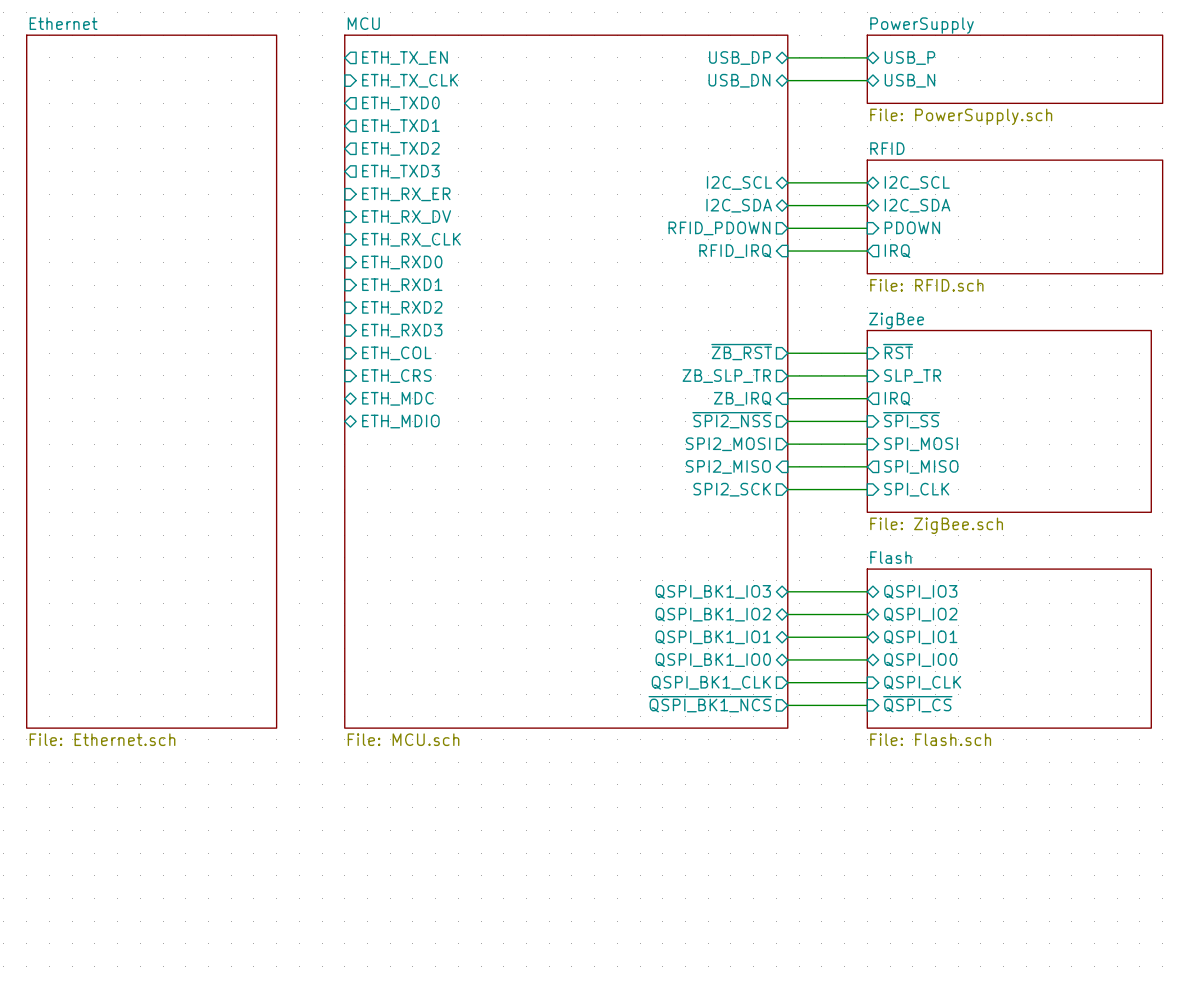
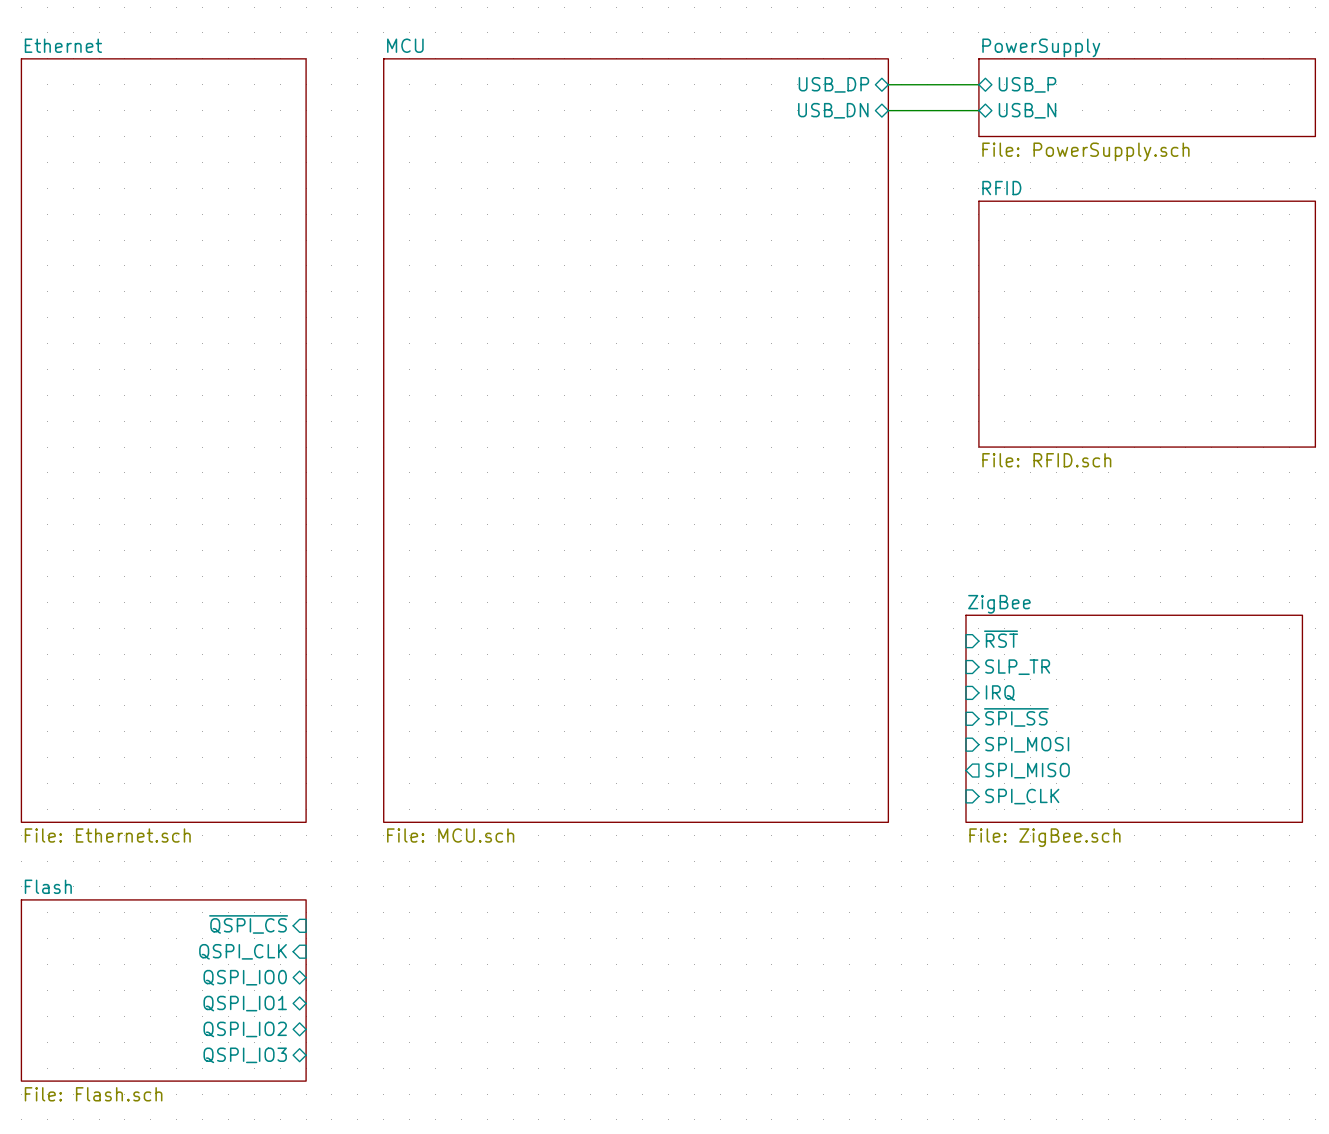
sheet pin: ETH_TX_EN (404, 58) -> none
sheet pin: ETH_TX_CLK (410, 80) -> none
sheet pin: ETH_TXD0 (400, 103) -> none
sheet pin: ETH_TXD1 (400, 126) -> none
sheet pin: ETH_TXD2 (400, 148) -> none
sheet pin: ETH_TXD3 (400, 171) -> none
sheet pin: I2C_SCL (739, 182) -> none
wire: (787, 182) (867, 182) -> none
sheet pin: I2C_SCL (917, 182) -> none
sheet pin: ETH_RX_ER (406, 194) -> none
sheet pin: I2C_SDA (739, 205) -> none
wire: (787, 205) (867, 205) -> none
sheet pin: I2C_SDA (917, 205) -> none
sheet RFID: File: RFID.sch (1014, 216) -> none
sheet pin: ETH_RX_DV (406, 217) -> none
sheet pin: PDOWN (912, 227) -> none
sheet pin: RFID_PDOWN (719, 228) -> none
wire: (787, 228) (867, 228) -> none
sheet pin: ETH_RX_CLK (411, 239) -> none
sheet pin: RFID_IRQ (735, 251) -> none
wire: (787, 251) (867, 251) -> none
sheet pin: IRQ (897, 251) -> none
sheet pin: ETH_RXD0 (402, 262) -> none
sheet RFID: none -> File: RFID.sch (1147, 324)
sheet pin: ETH_RXD1 (402, 285) -> none
sheet pin: ETH_RXD2 (402, 307) -> none
sheet pin: ETH_RXD3 (402, 330) -> none
sheet pin position: ~{RST} (898, 351) -> ~{RST} (1001, 639)
sheet pin: ~{ZB_RST} (741, 352) -> none
sheet pin: ETH_COL (396, 353) -> none
wire: (787, 353) (867, 353) -> none
sheet Ethernet: none -> File: Ethernet.sch (163, 440)
sheet MCU: none -> File: MCU.sch (636, 440)
wire: (787, 375) (867, 375) -> none
sheet pin: ETH_CRS (396, 376) -> none
sheet pin: ZB_SLP_TR (726, 376) -> none
sheet pin position: SLP_TR (912, 376) -> SLP_TR (1017, 667)
sheet Ethernet: File: Ethernet.sch (151, 381) -> none
sheet MCU: File: MCU.sch (566, 381) -> none
sheet pin: ETH_MDC (397, 398) -> none
sheet pin: ZB_IRQ (742, 398) -> none
wire: (787, 398) (867, 398) -> none
sheet pin: IRQ (897, 398) -> none
sheet pin: ~{SPI2_NSS} (732, 420) -> none
sheet pin position: ~{SPI_SS} (911, 420) -> ~{SPI_SS} (1016, 717)
sheet pin: ETH_MDIO (400, 421) -> none
wire: (787, 421) (867, 421) -> none
sheet ZigBee: File: ZigBee.sch (1009, 421) -> none
sheet pin: SPI2_MOSI (728, 444) -> none
wire: (787, 444) (867, 444) -> none
sheet pin position: SPI_MOSI (921, 444) -> SPI_MOSI (1027, 744)
sheet pin: SPI2_MISO (728, 466) -> none
wire: (787, 466) (867, 466) -> none
sheet pin position: SPI_MISO (921, 466) -> SPI_MISO (1027, 770)
sheet pin: SPI2_SCK (732, 489) -> none
wire: (787, 489) (867, 489) -> none
sheet pin position: SPI_CLK (916, 489) -> SPI_CLK (1022, 796)
sheet pin: QSPI_BK1_IO3 (713, 591) -> none
wire: (787, 591) (867, 591) -> none
sheet pin: none -> IRQ (1000, 693)
sheet pin: QSPI_IO3 (920, 591) -> none
sheet pin: QSPI_BK1_IO2 (713, 614) -> none
wire: (787, 614) (867, 614) -> none
sheet pin: QSPI_IO2 (920, 614) -> none
sheet ZigBee: none -> File: ZigBee.sch (1134, 718)
sheet pin: QSPI_BK1_IO1 (713, 637) -> none
wire: (787, 637) (867, 637) -> none
sheet pin: QSPI_IO1 (920, 637) -> none
sheet Flash: File: Flash.sch (1009, 648) -> none
wire: (787, 659) (867, 659) -> none
sheet pin: QSPI_BK1_IO0 (713, 660) -> none
sheet pin: QSPI_IO0 (920, 660) -> none
sheet pin: QSPI_BK1_CLK (711, 682) -> none
wire: (787, 682) (867, 682) -> none
sheet pin: QSPI_CLK (922, 682) -> none
sheet pin: ~{QSPI_BK1_NCS} (710, 704) -> none
sheet pin: ~{QSPI_CS} (917, 704) -> none
wire: (787, 705) (867, 705) -> none
sheet pin: none -> ~{QSPI_CS} (248, 924)
sheet pin: none -> QSPI_CLK (243, 951)
sheet pin: none -> QSPI_IO0 (245, 977)
sheet Flash: none -> File: Flash.sch (163, 990)
sheet pin: none -> QSPI_IO1 (245, 1003)
sheet pin: none -> QSPI_IO2 (245, 1029)
sheet pin: none -> QSPI_IO3 (245, 1055)

